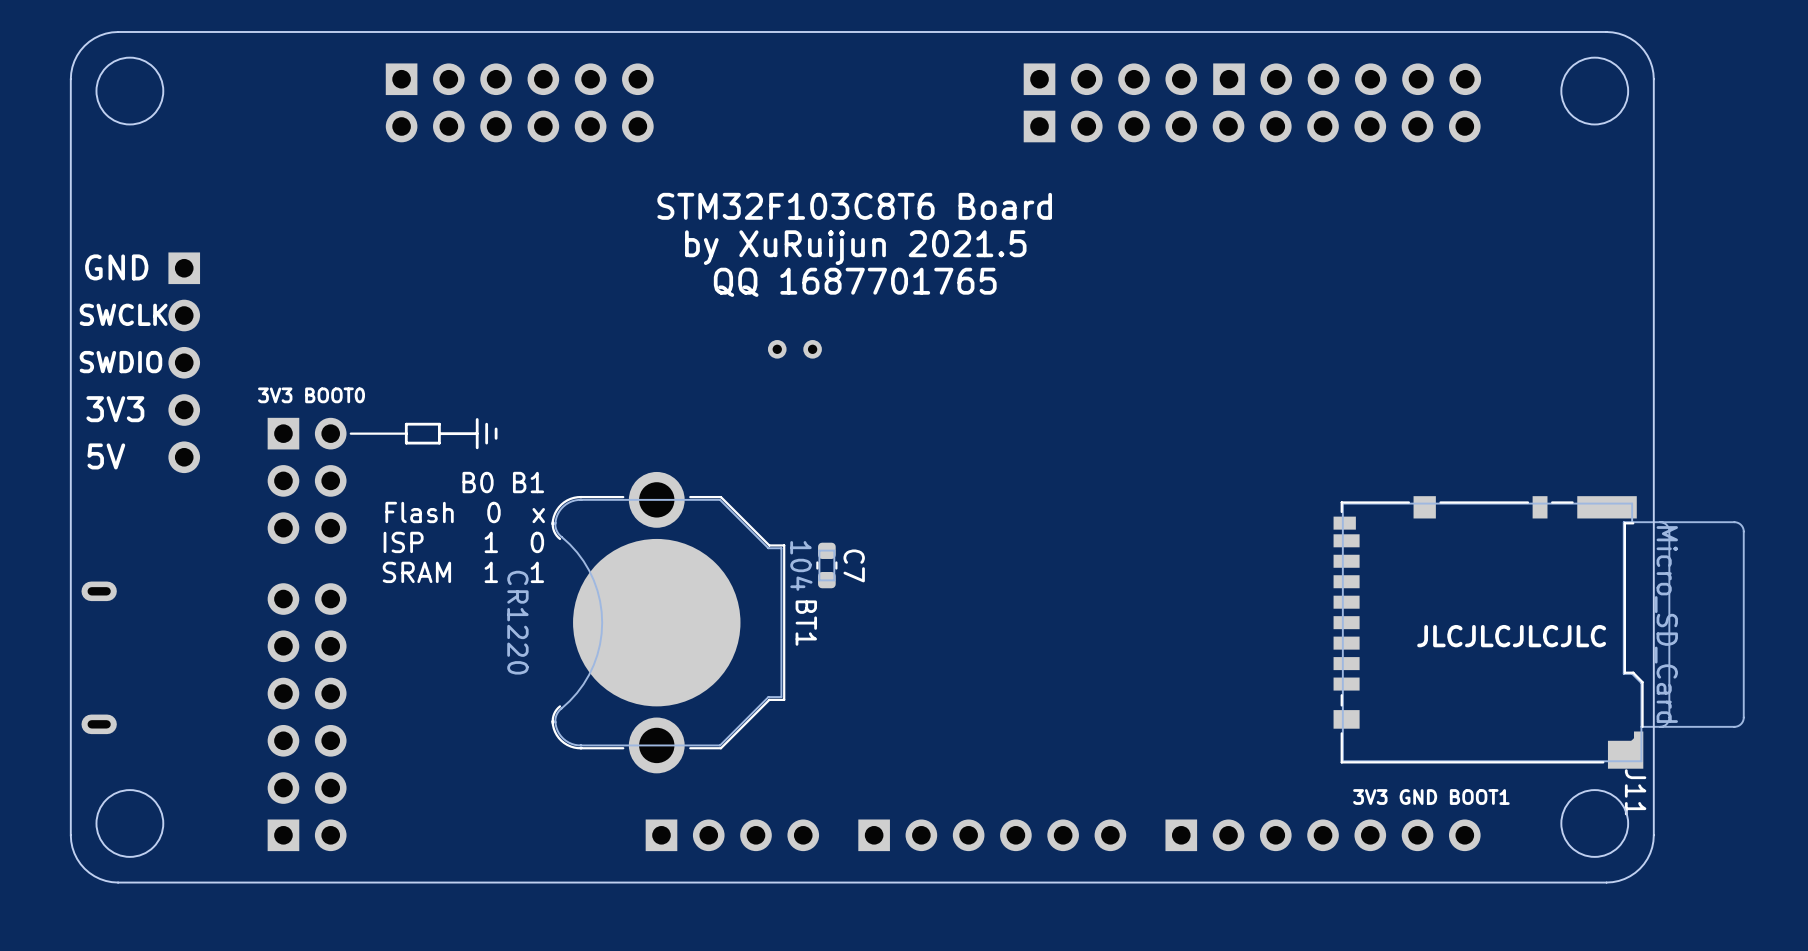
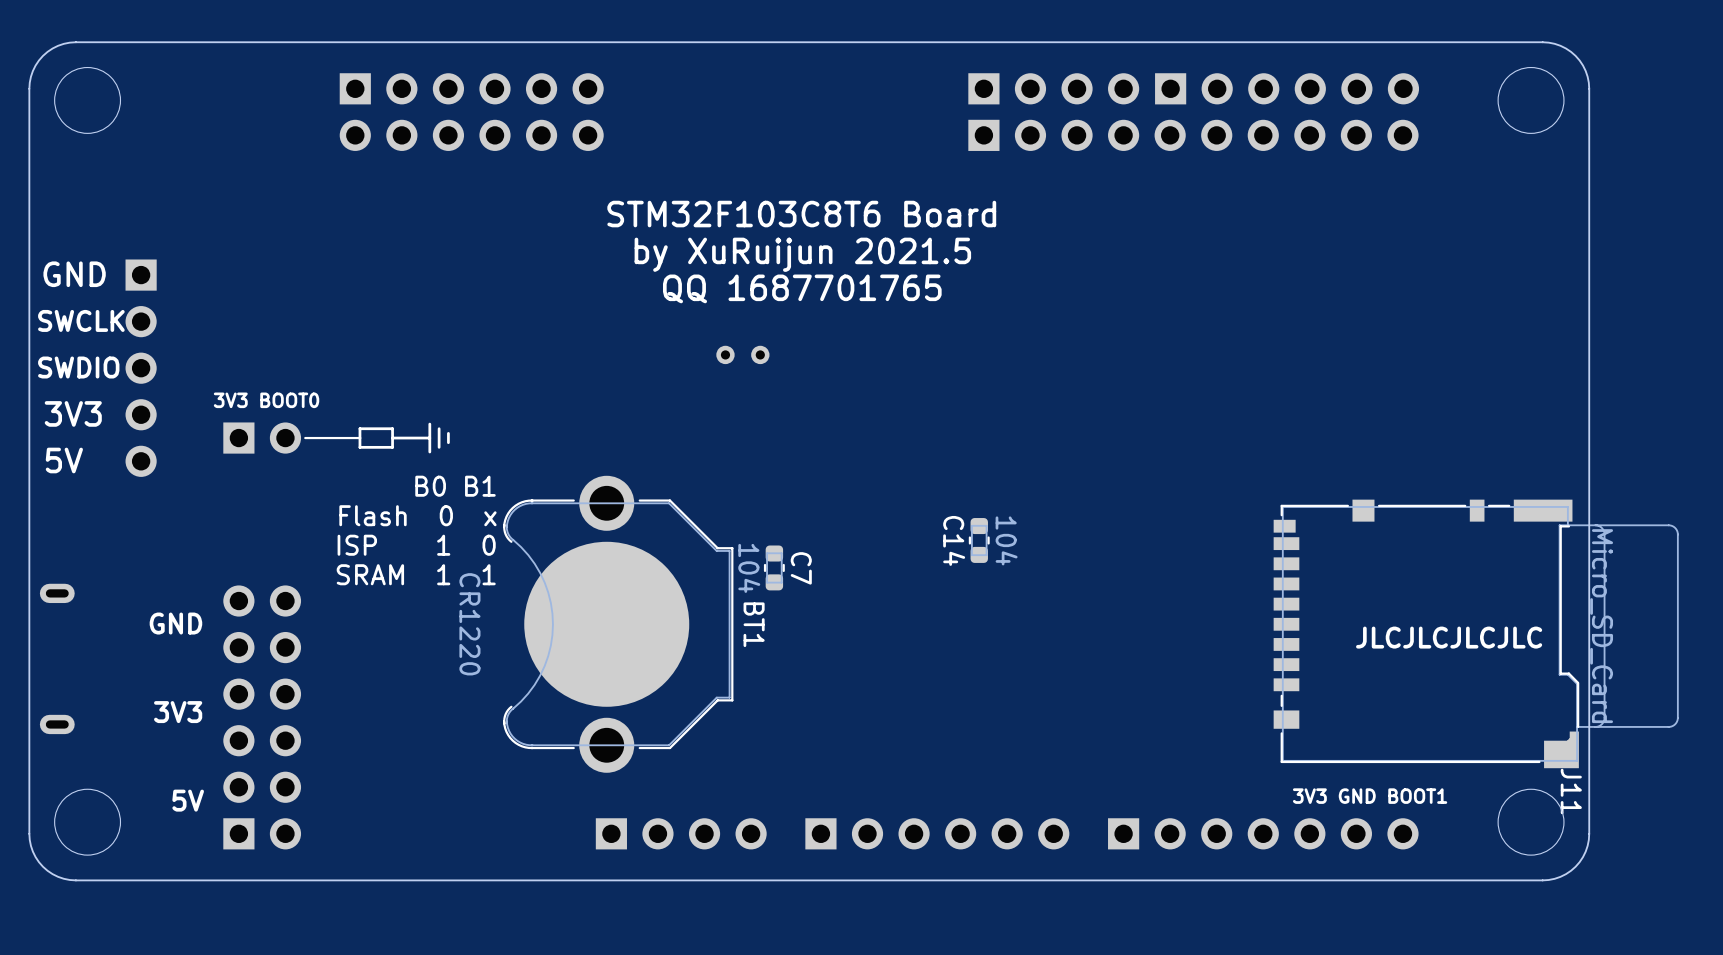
part: (307, 480) -> none
C14: none -> 104 (979, 540)
text: none -> GND (175, 623)
text: none -> 3V3 (178, 712)
text: none -> 5V (188, 800)

